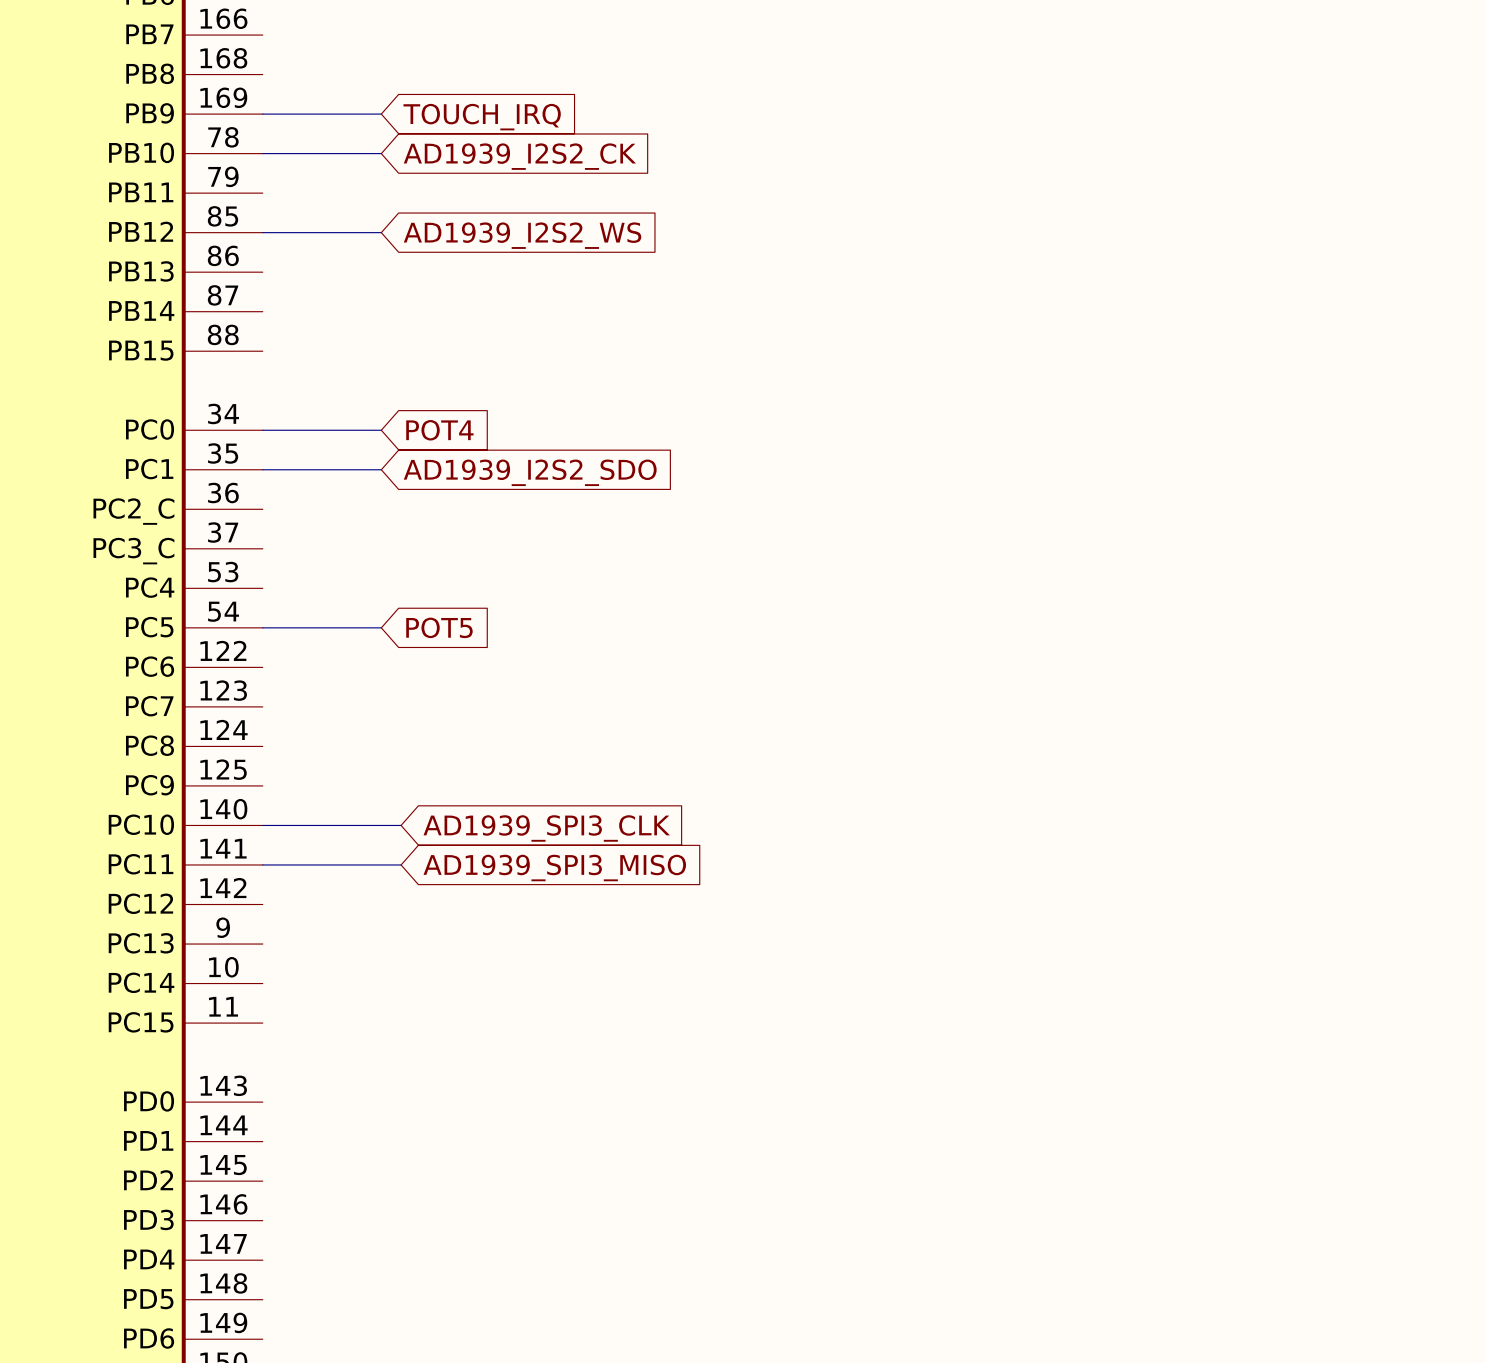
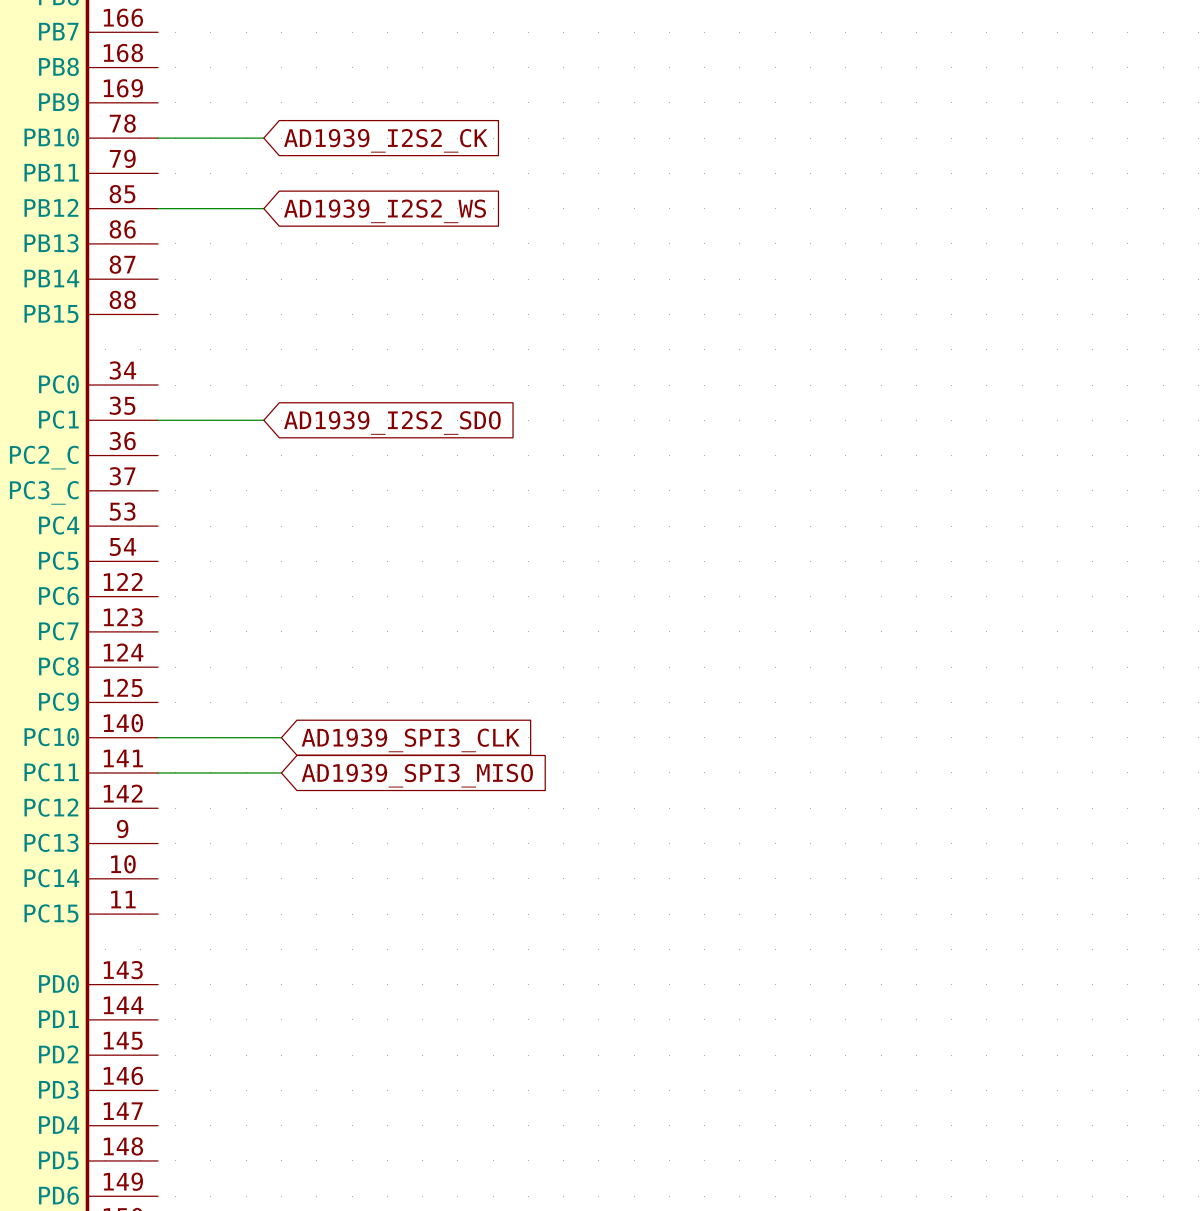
wire: (262, 114) (381, 114) -> none
global label: TOUCH_IRQ (482, 117) -> none
wire: (262, 430) (381, 430) -> none
global label: POT4 (439, 430) -> none
wire: (262, 627) (381, 627) -> none
global label: POT5 (439, 627) -> none

